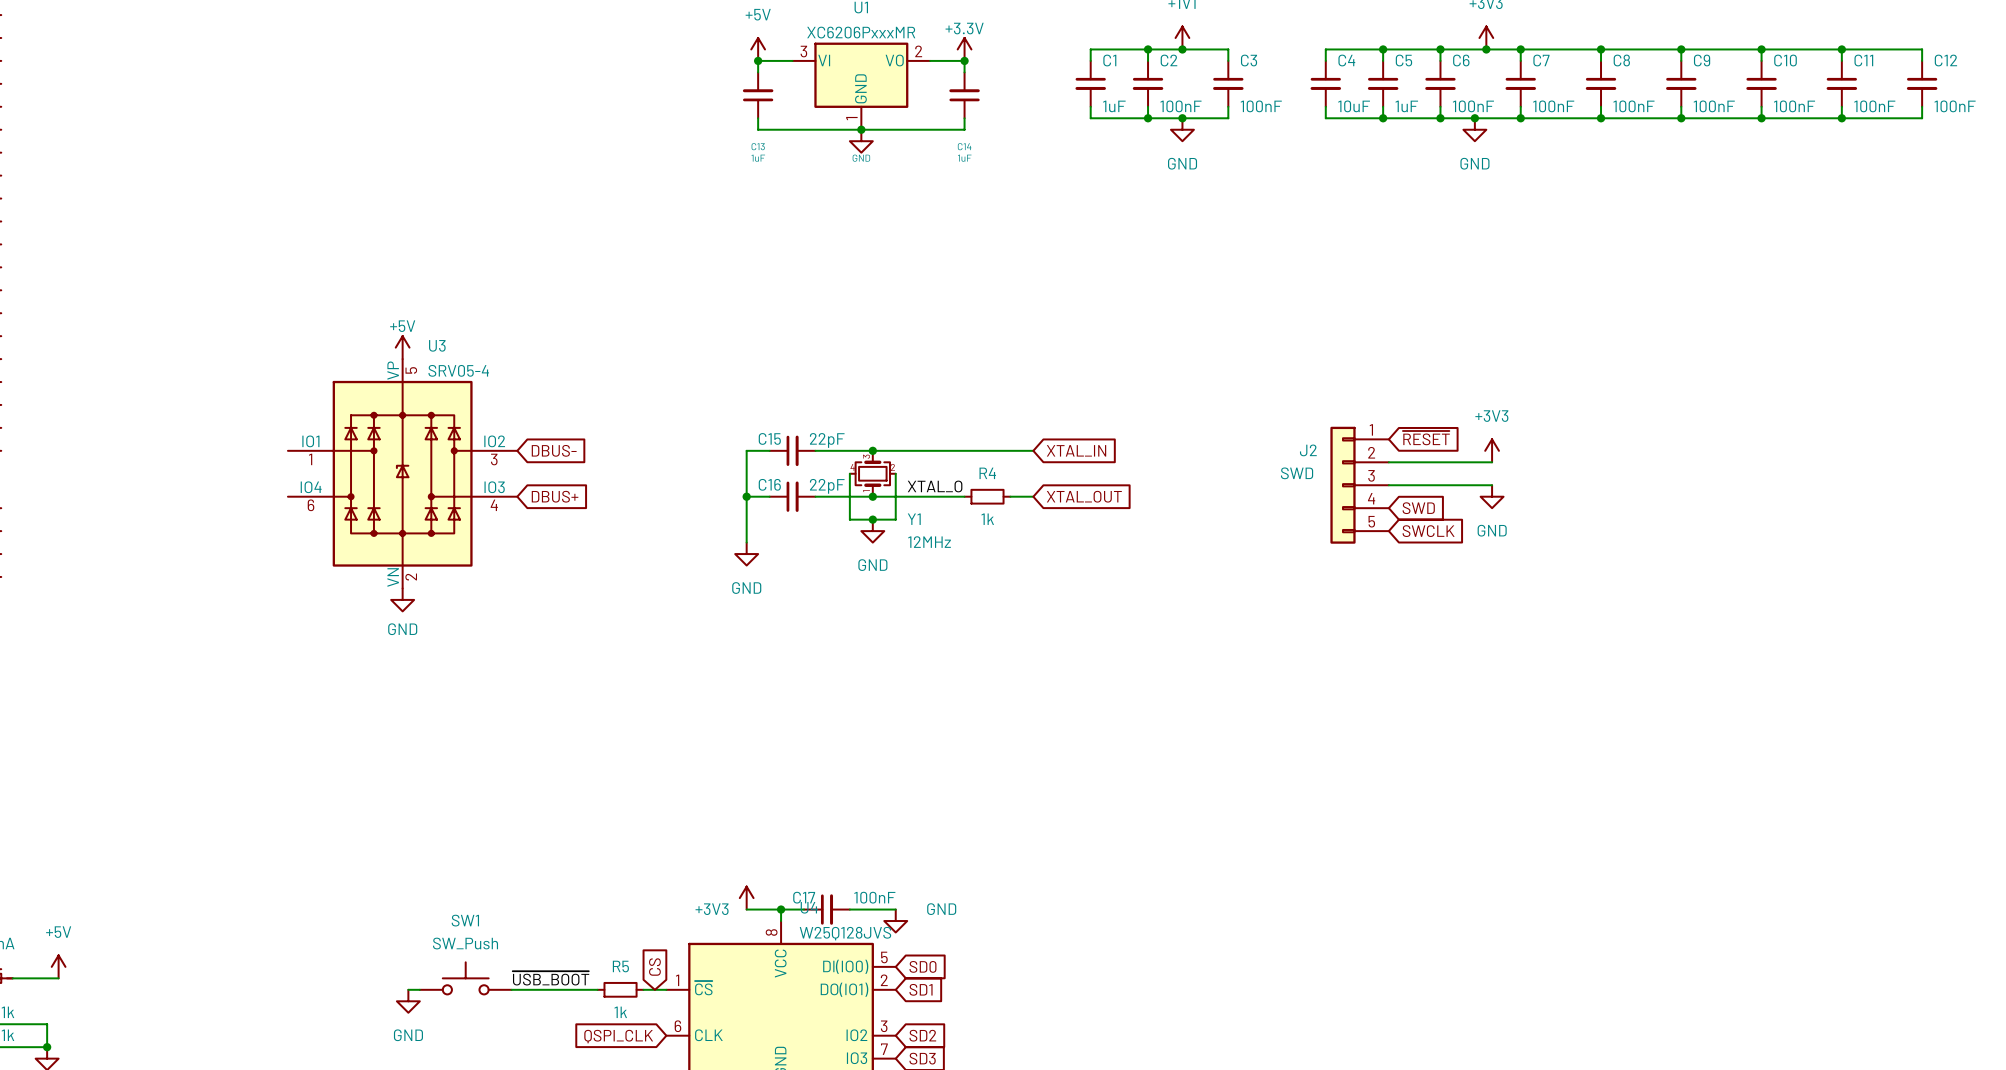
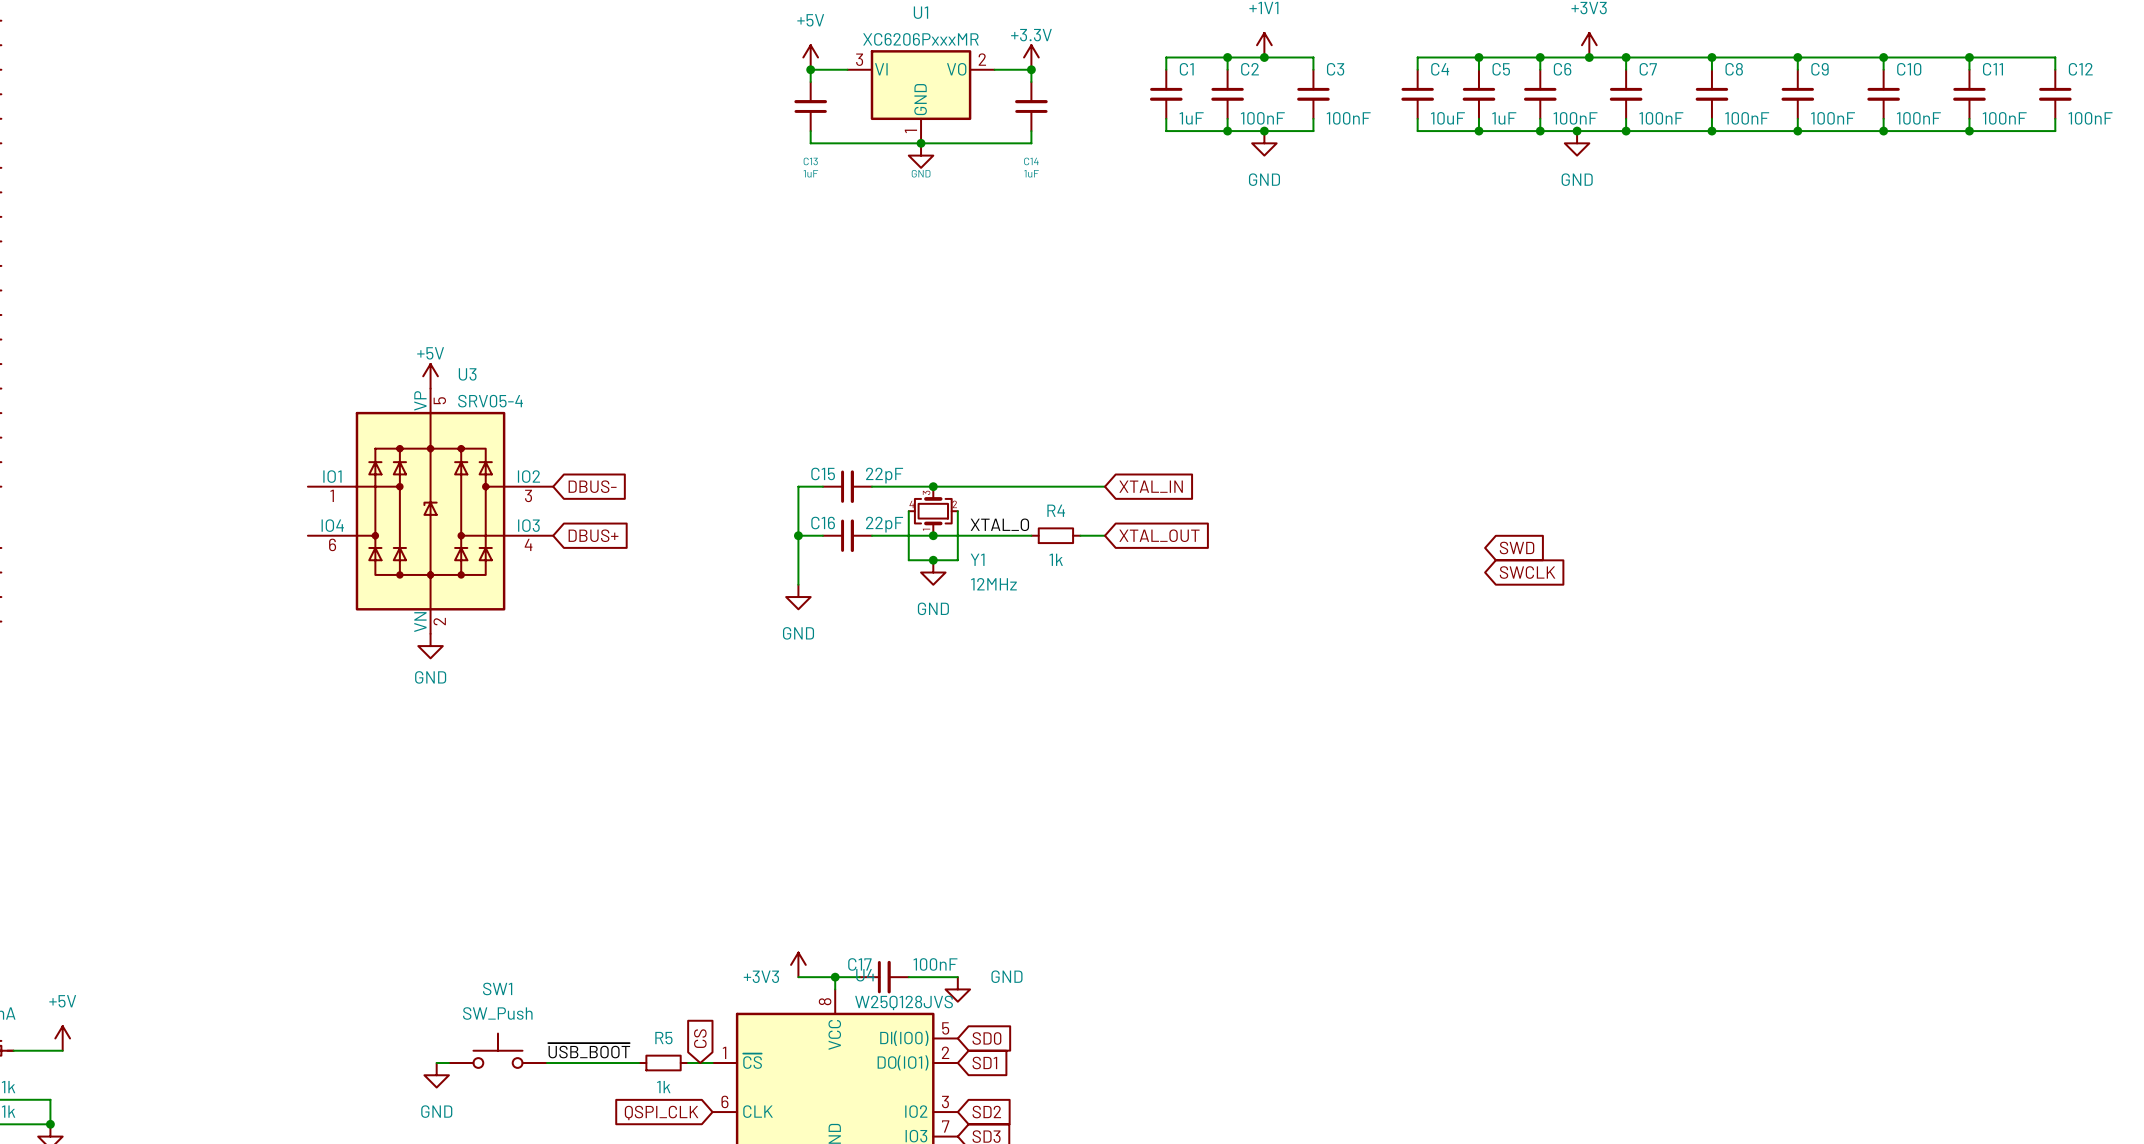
global label: ~{RESET} (1426, 438) -> none
power symbol: +3V3 (1492, 450) -> none
wire: (1388, 462) (1492, 462) -> none
J2: SWD (1359, 485) -> none
wire: (1388, 485) (1492, 485) -> none
power symbol: GND (1492, 496) -> none

